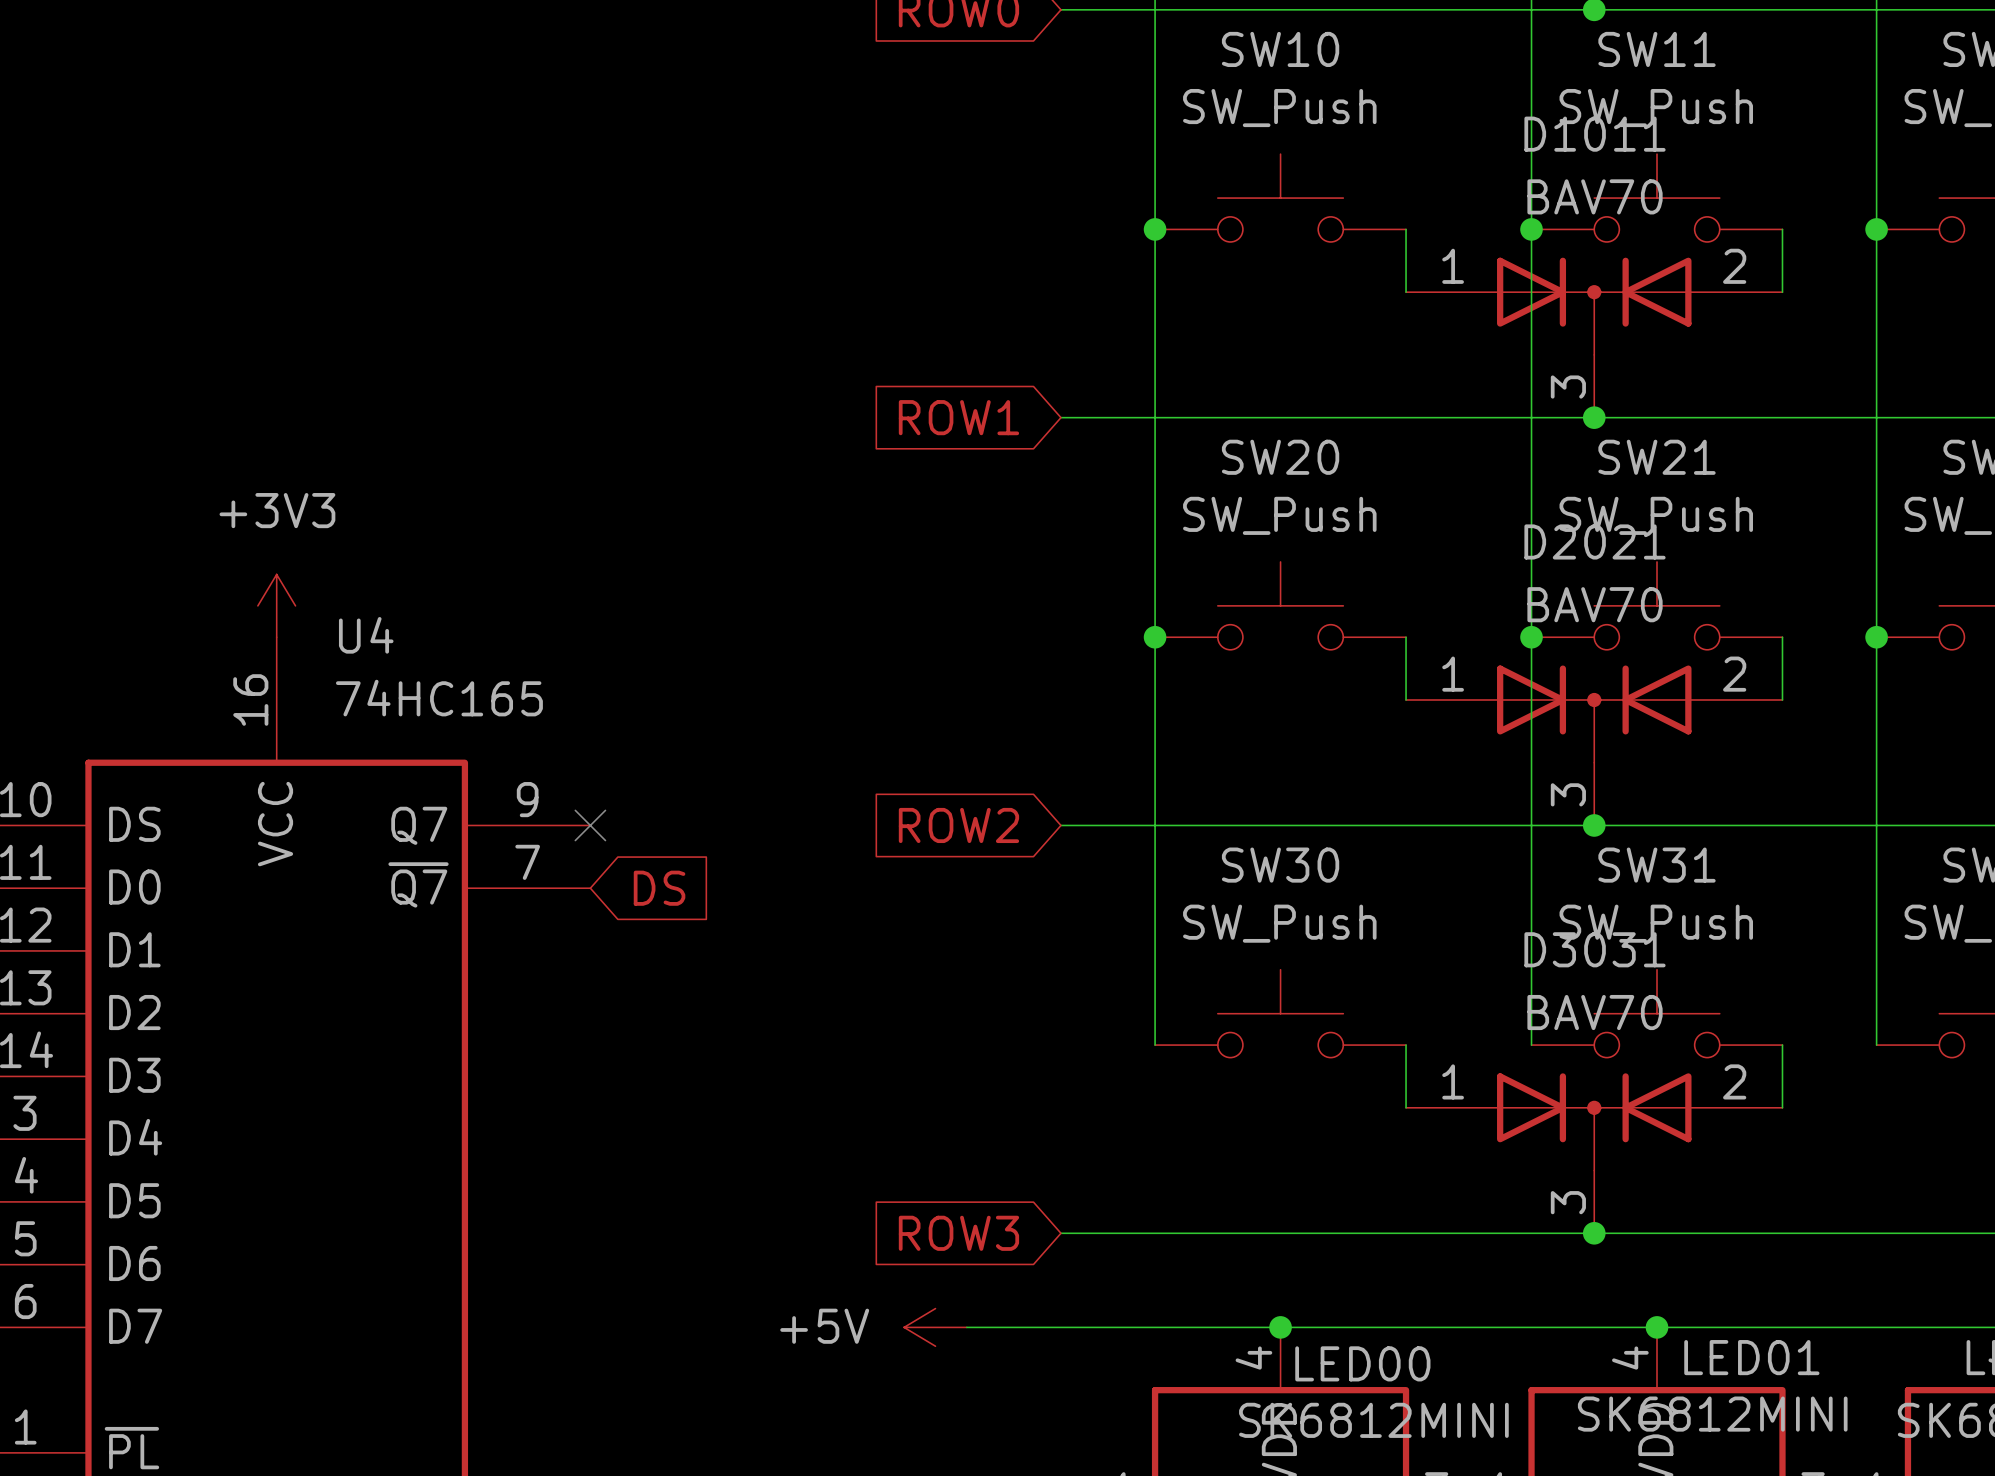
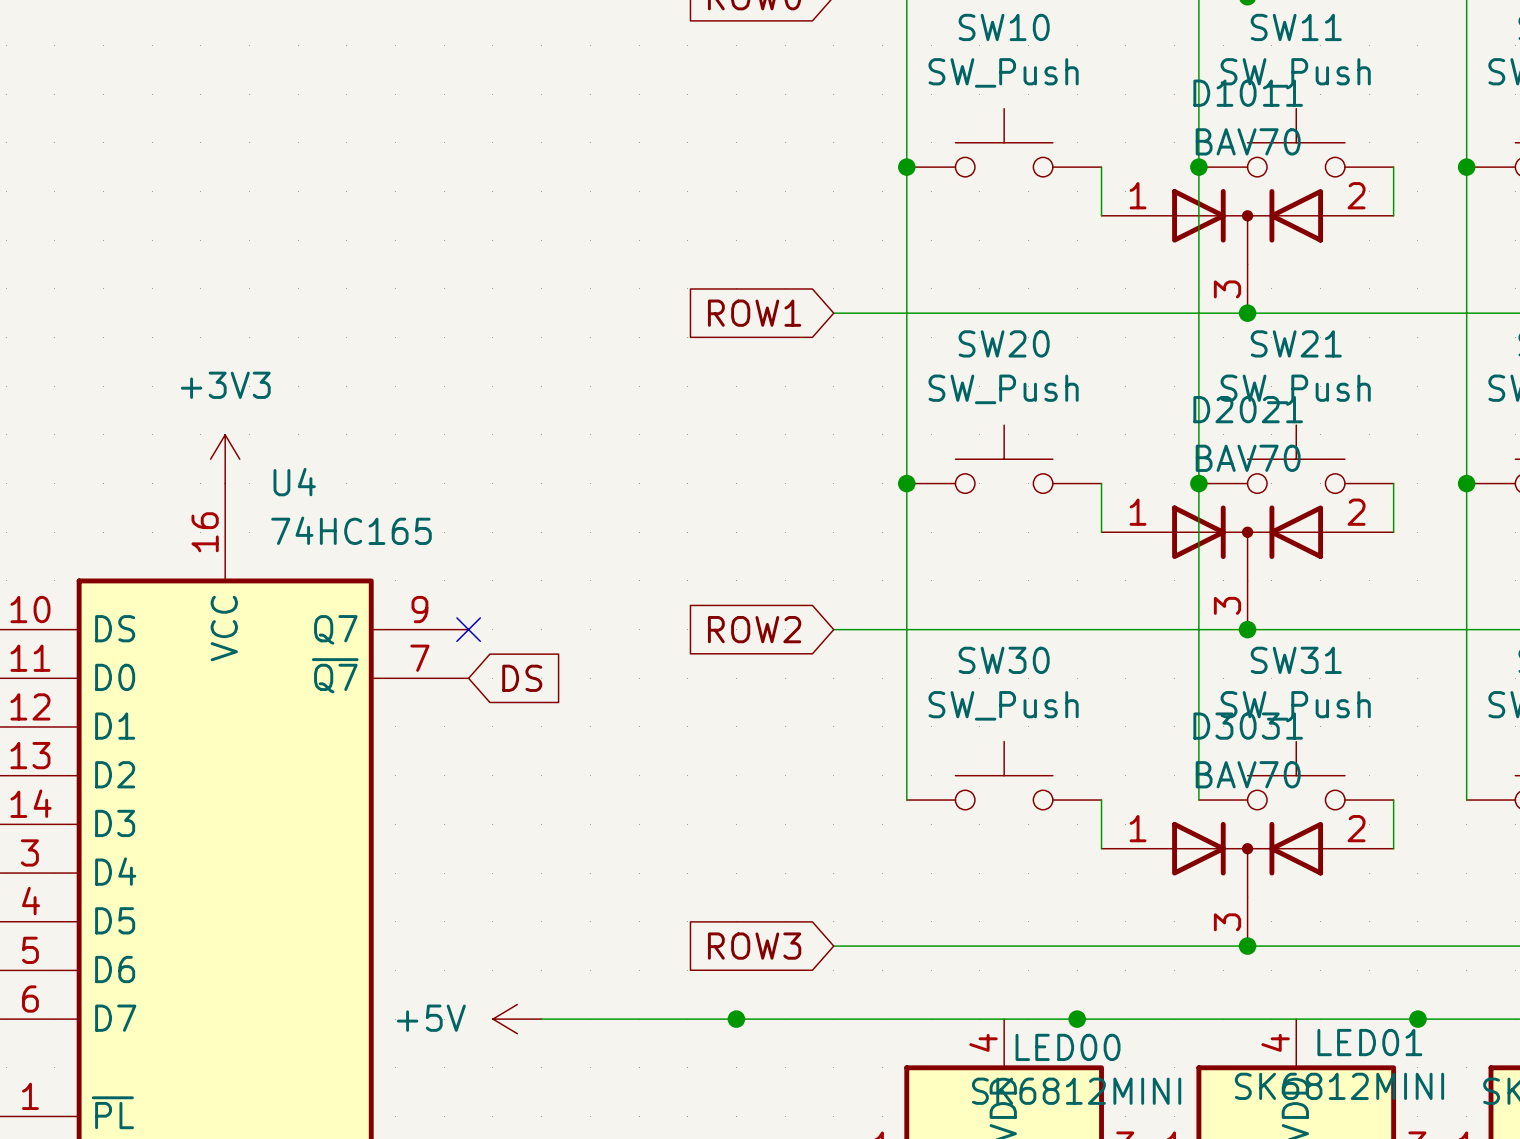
power symbol: none -> +5V (517, 1019)
wire: none -> (541, 1019) (760, 1019)
junction: none -> (736, 1019)
power symbol: +5V (935, 1327) -> none
junction position: (1280, 1327) -> (1077, 1019)
junction: (1657, 1327) -> none
junction: none -> (1417, 1019)

